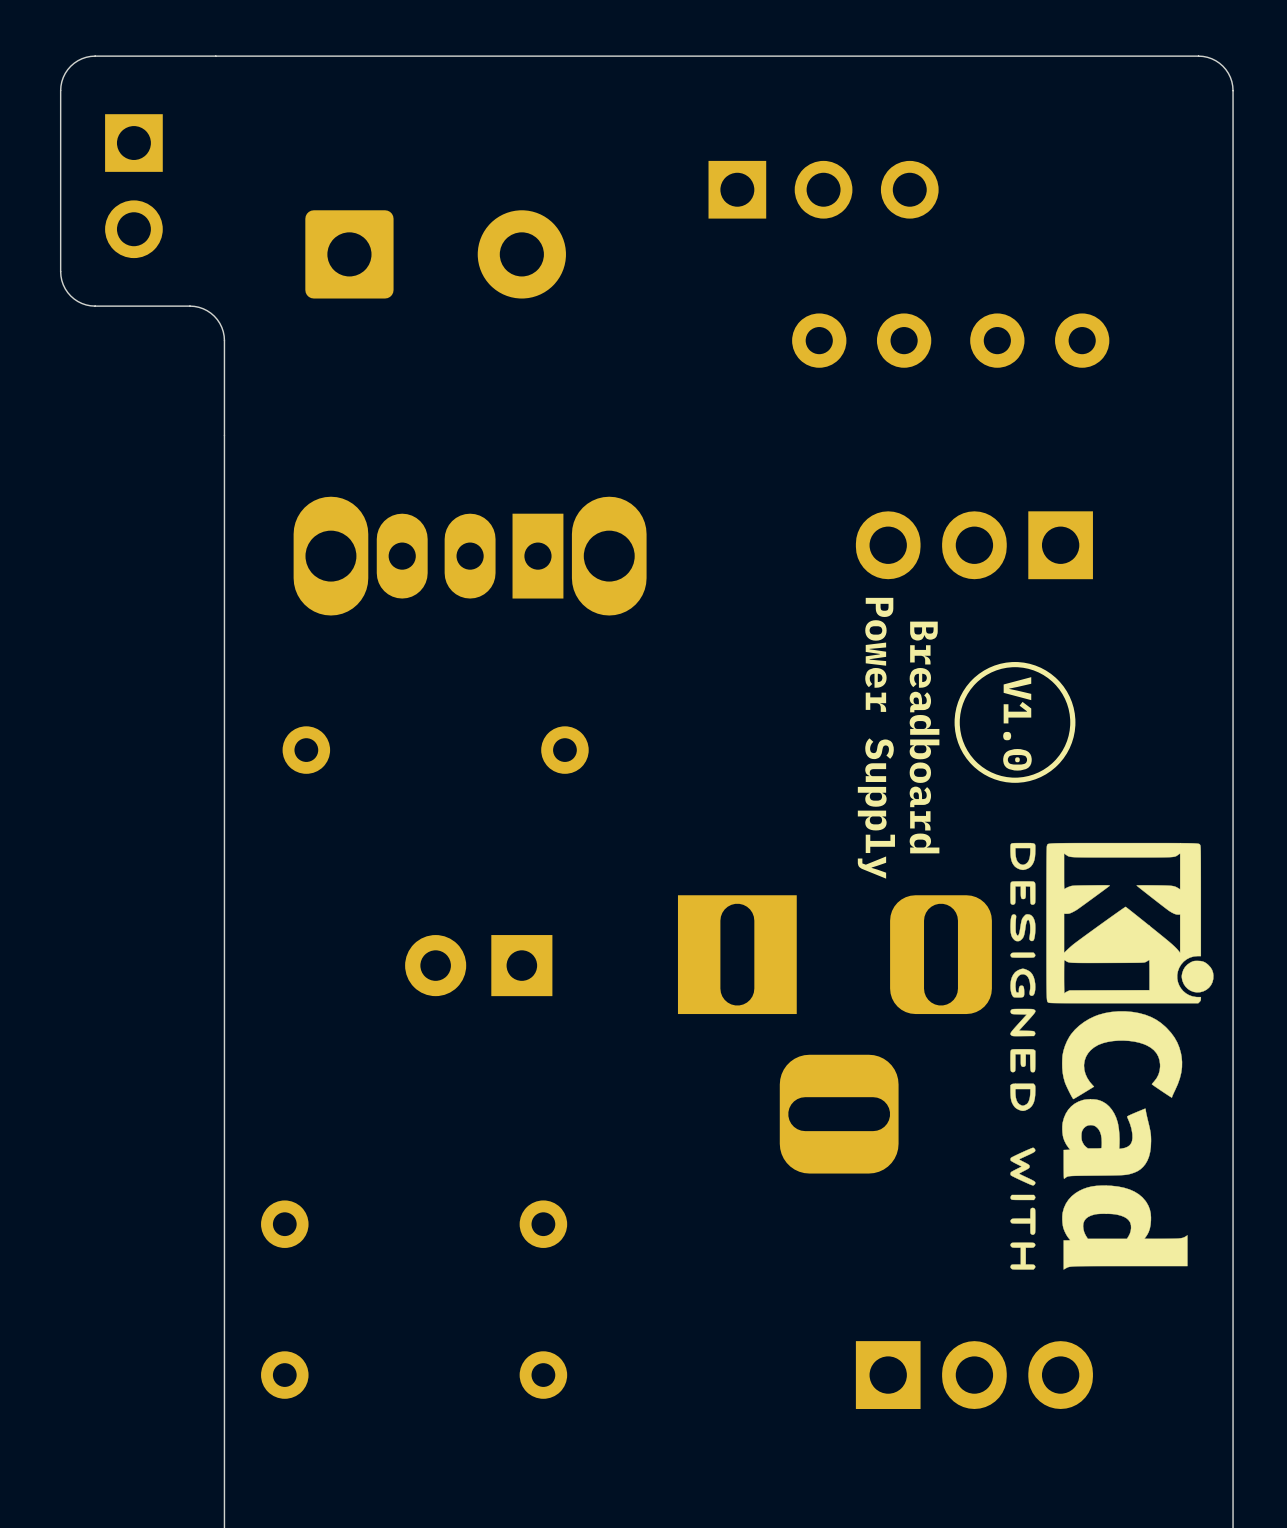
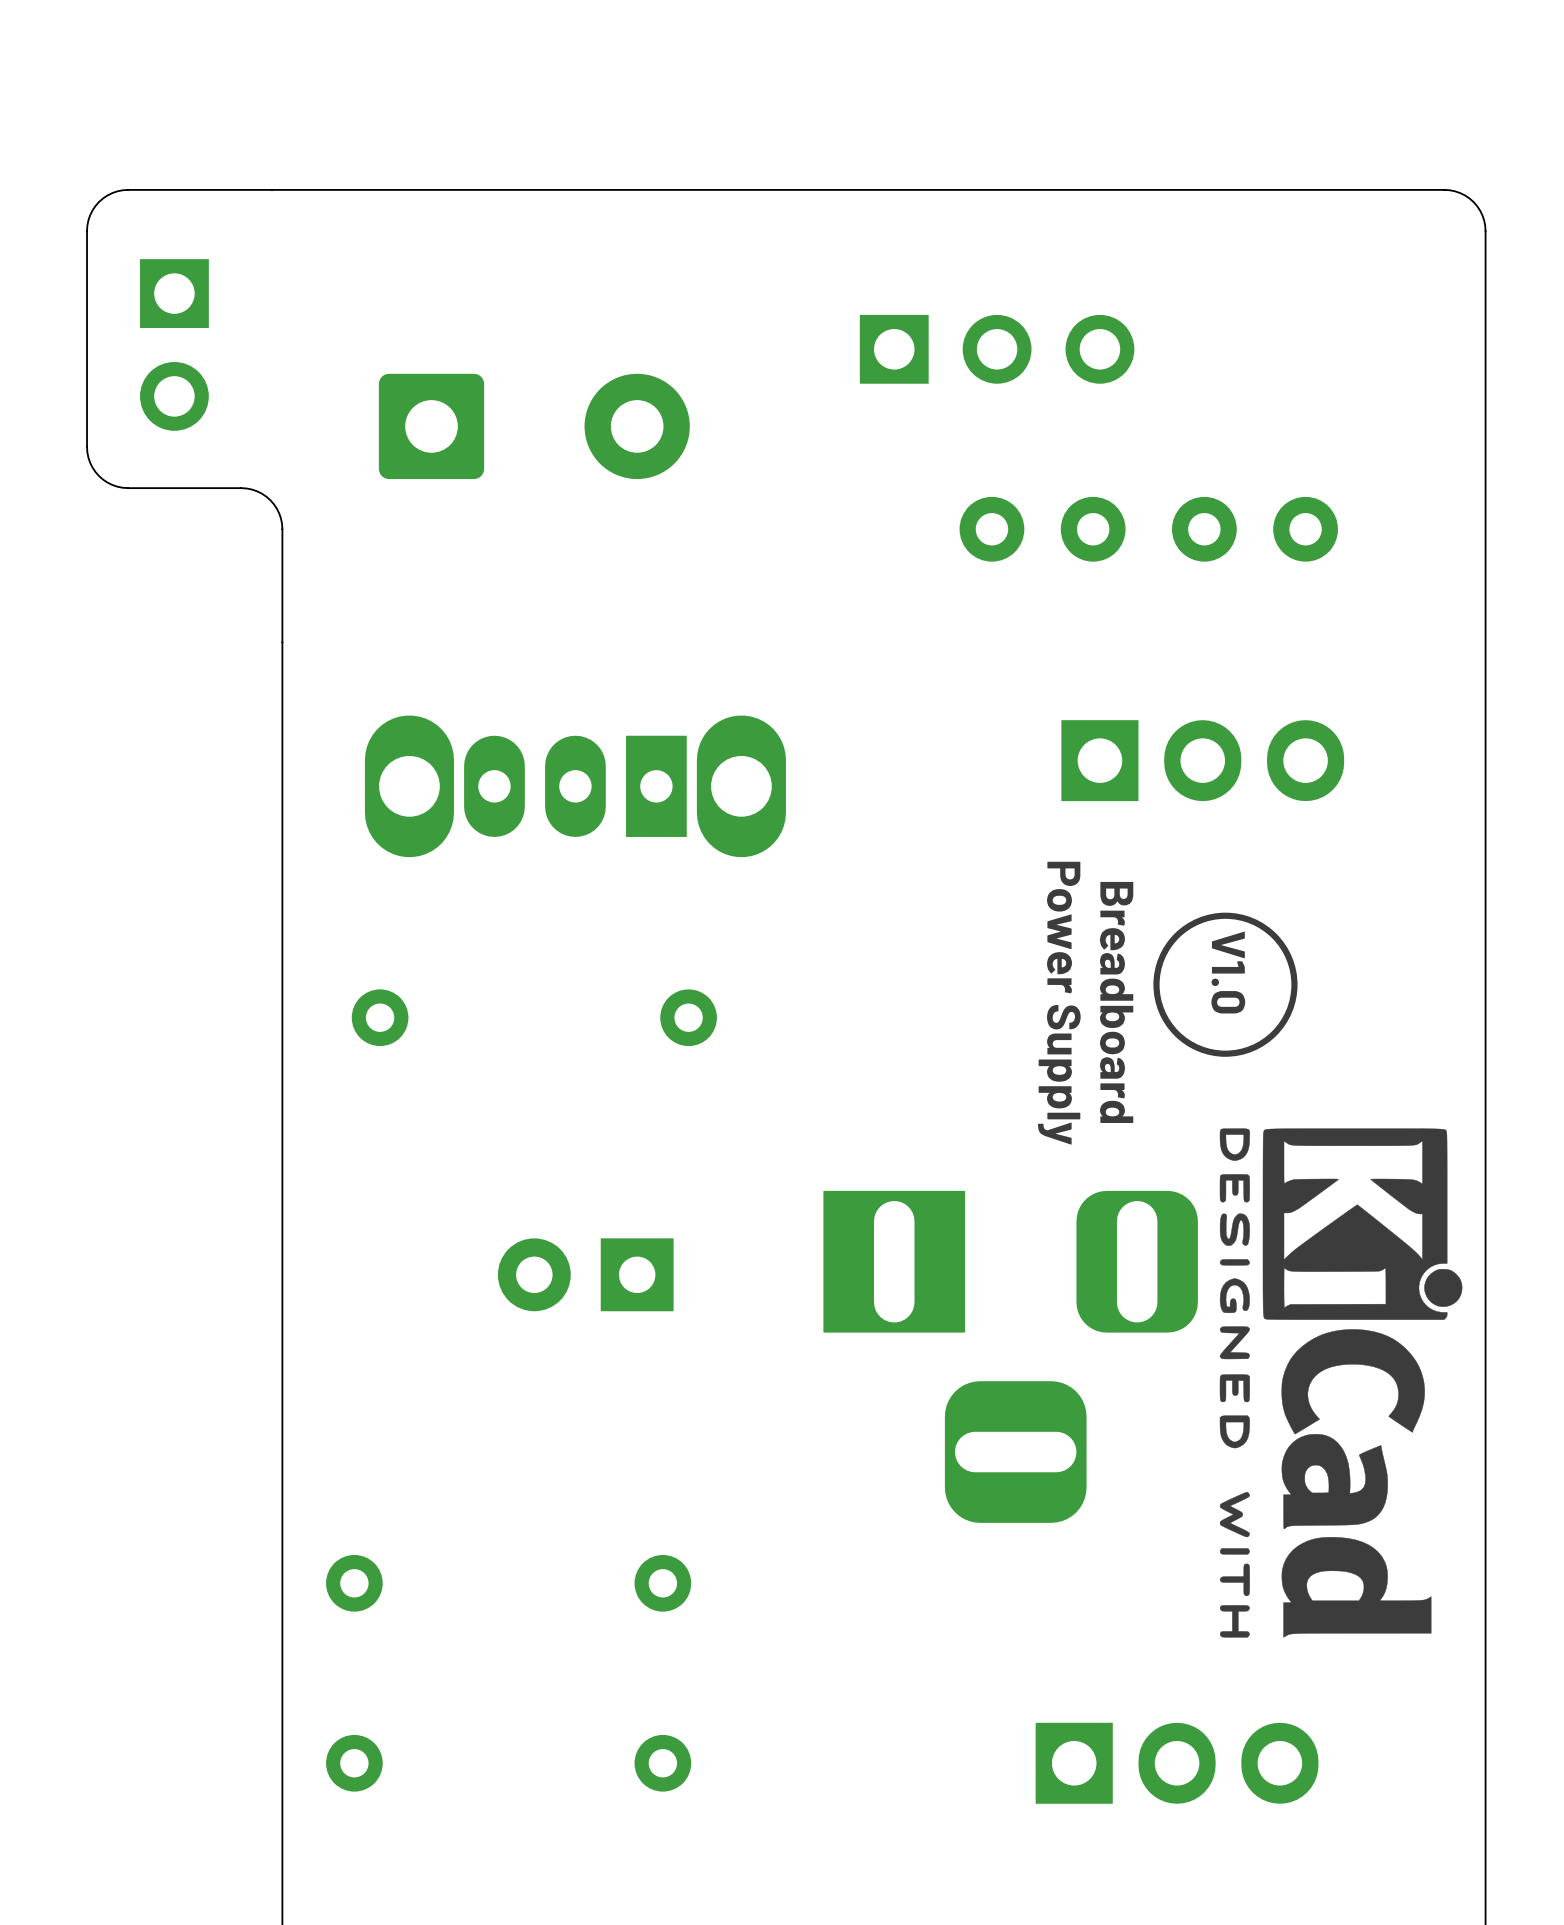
part rotation: 0° (974, 545) -> 180° (1202, 760)

